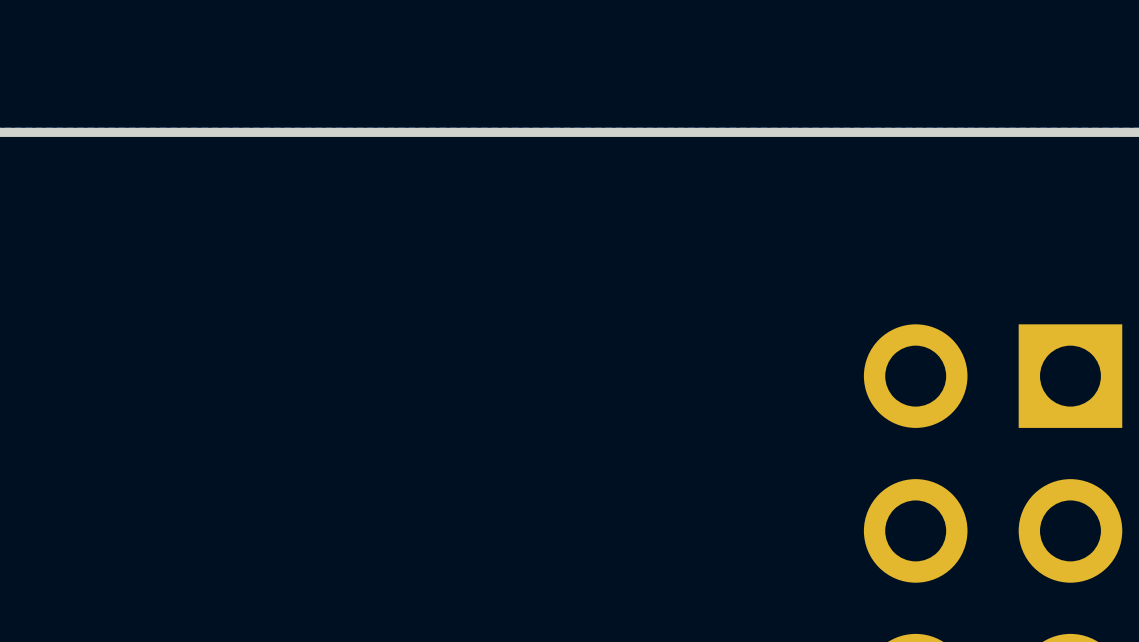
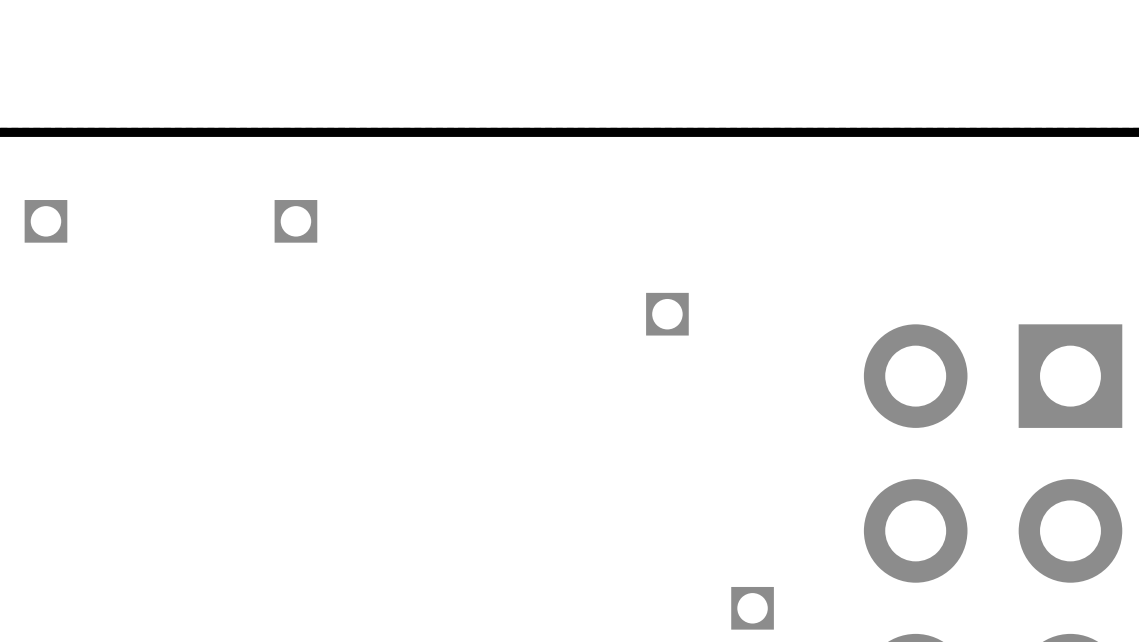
part: none -> (45, 221)
part: none -> (295, 221)
part: none -> (667, 314)
part: none -> (752, 608)

